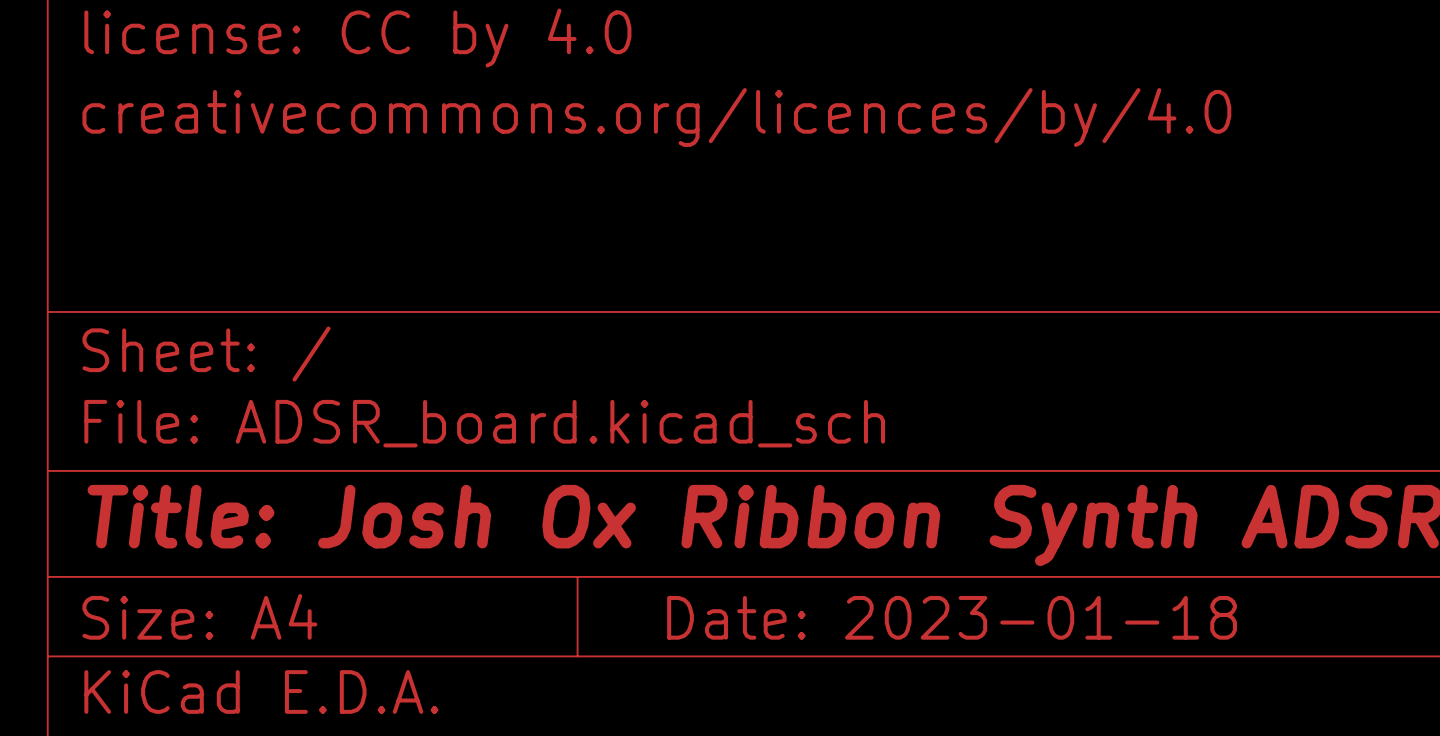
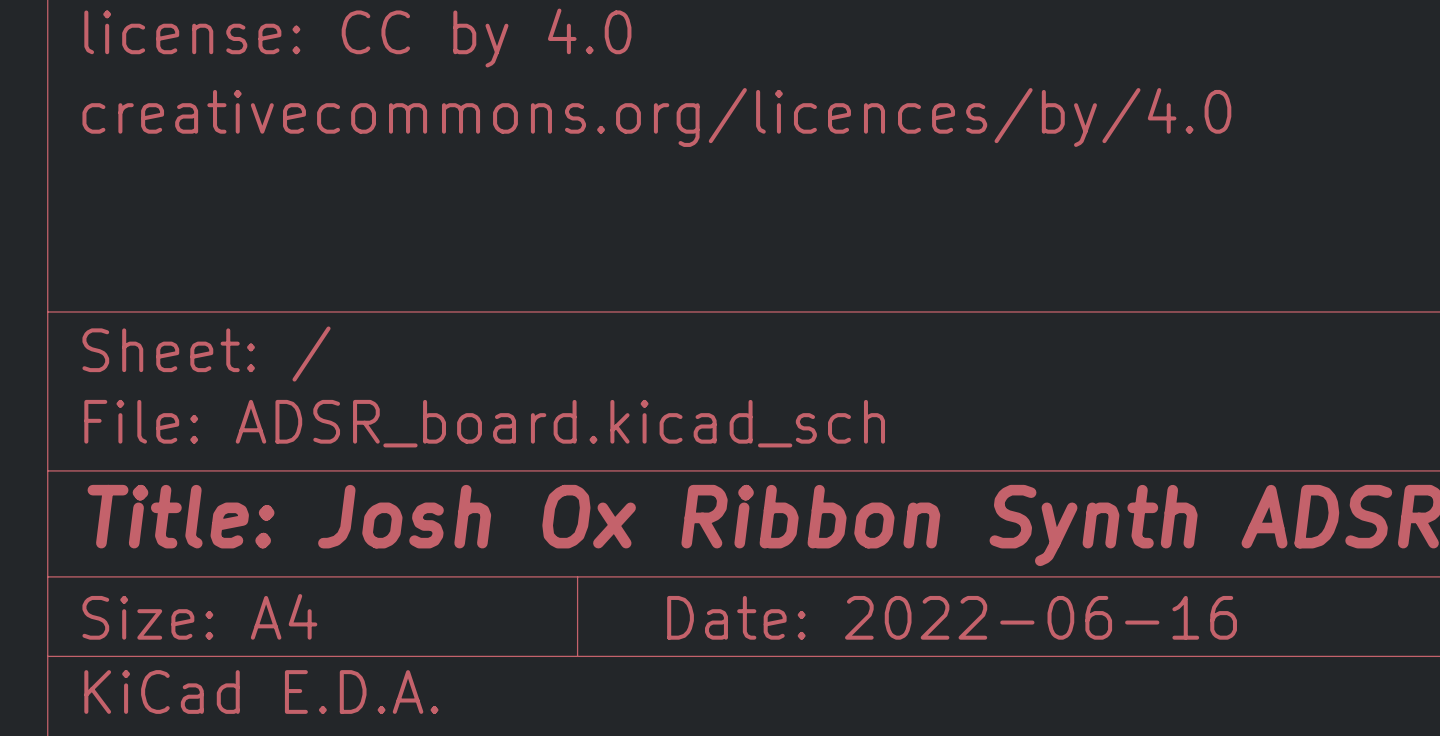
title block: Date: 2023-01-18 (952, 617) -> Date: 2022-06-16 (952, 617)

